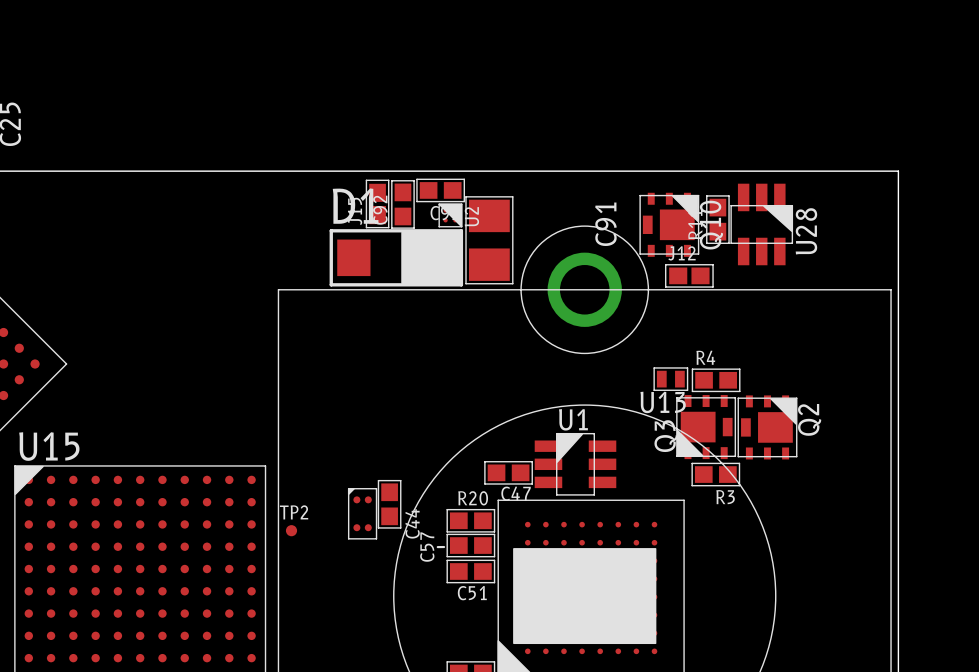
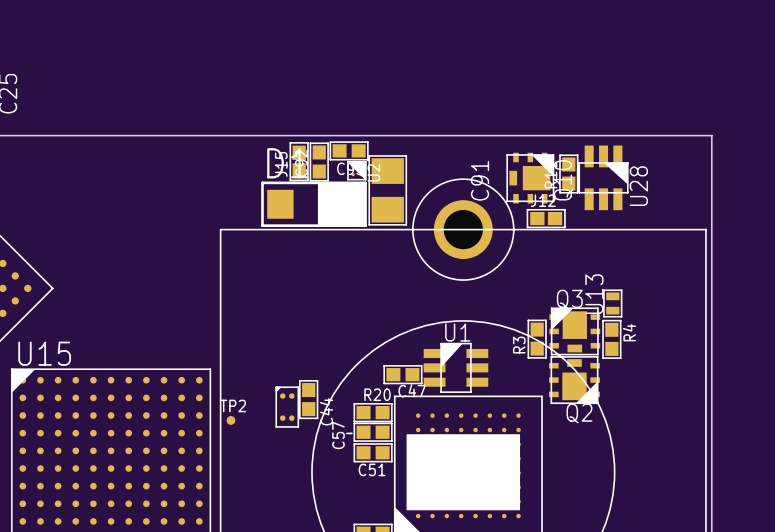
U13 rotation: 0° (670, 379) -> 90° clockwise (612, 303)
U13 position: (670, 379) -> (612, 303)
R4 rotation: 0° (716, 380) -> 90° clockwise (611, 339)
R4 position: (716, 380) -> (611, 339)
Q3 rotation: 0° (706, 427) -> 90° clockwise (574, 331)
Q2 rotation: 0° (767, 427) -> 90° clockwise (574, 380)
Q2 position: (767, 427) -> (574, 380)
R3 rotation: 0° (715, 474) -> 90° clockwise (537, 339)
R3 position: (715, 474) -> (537, 339)

